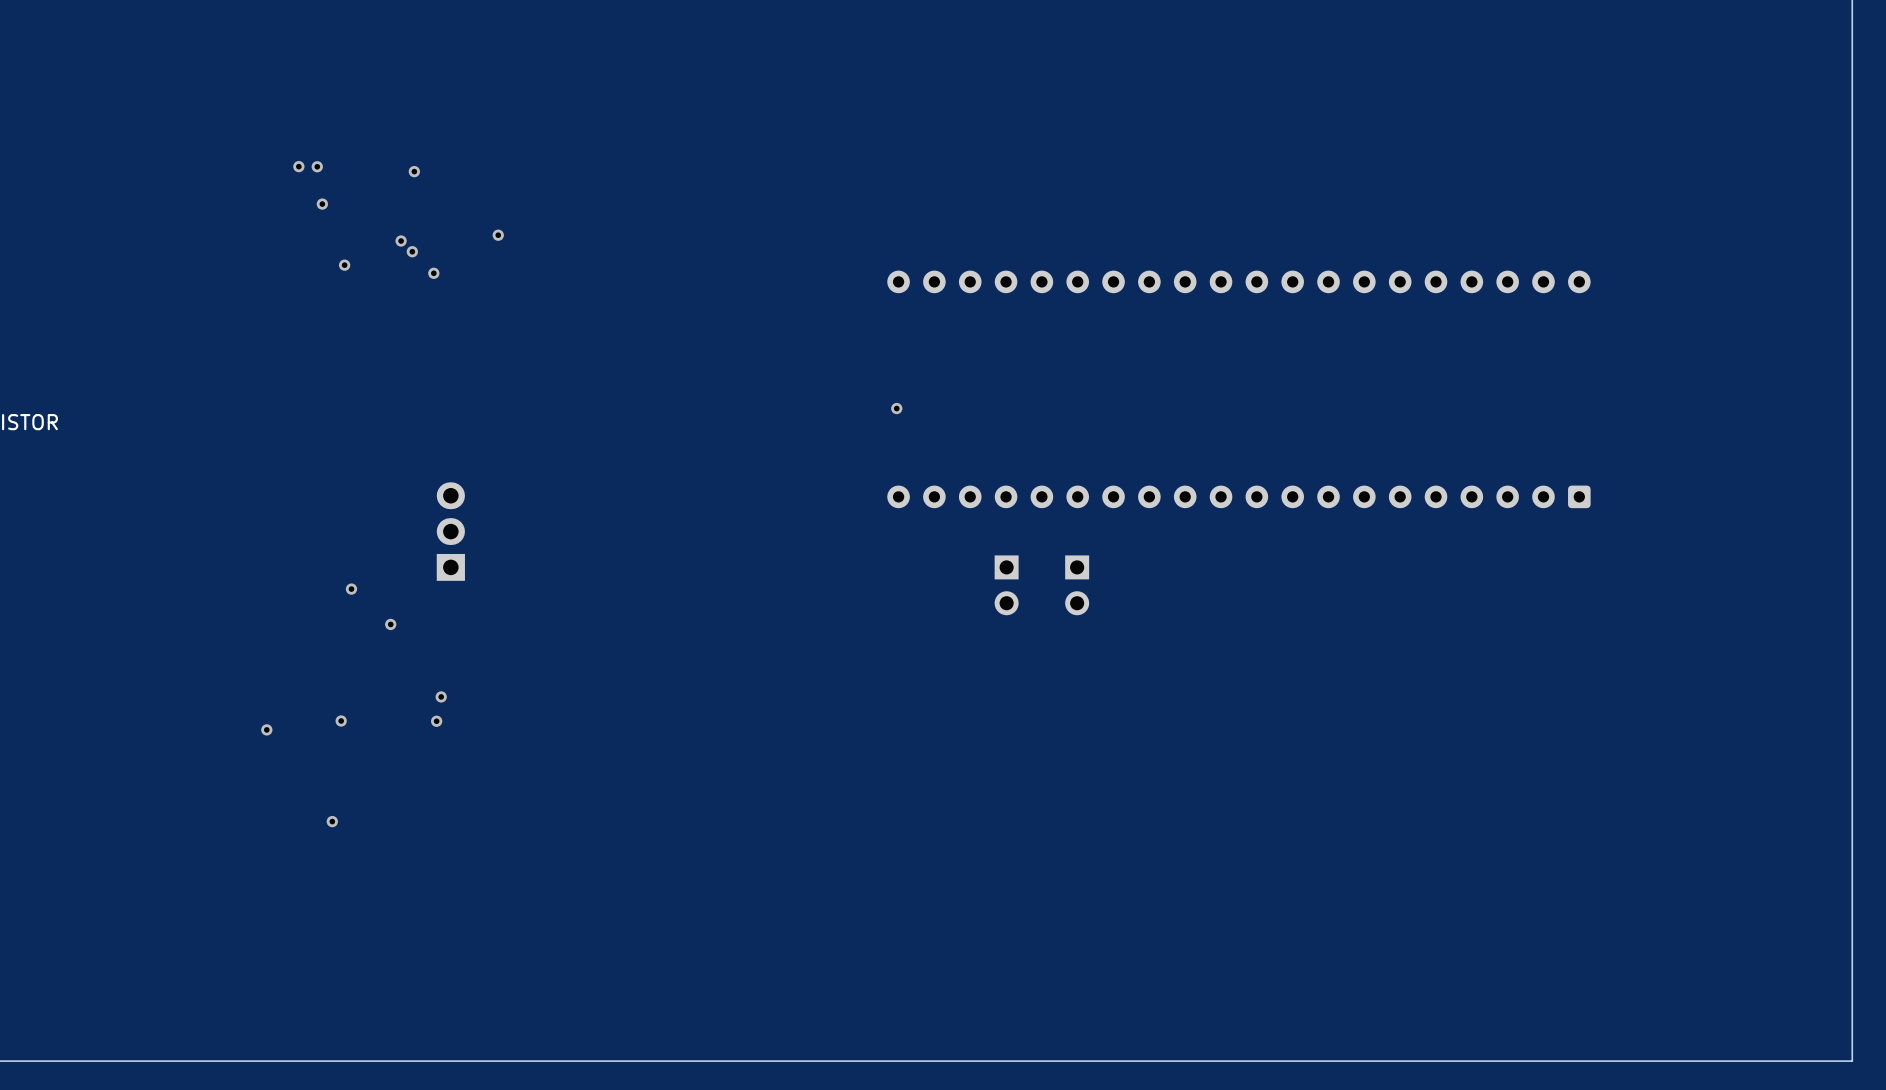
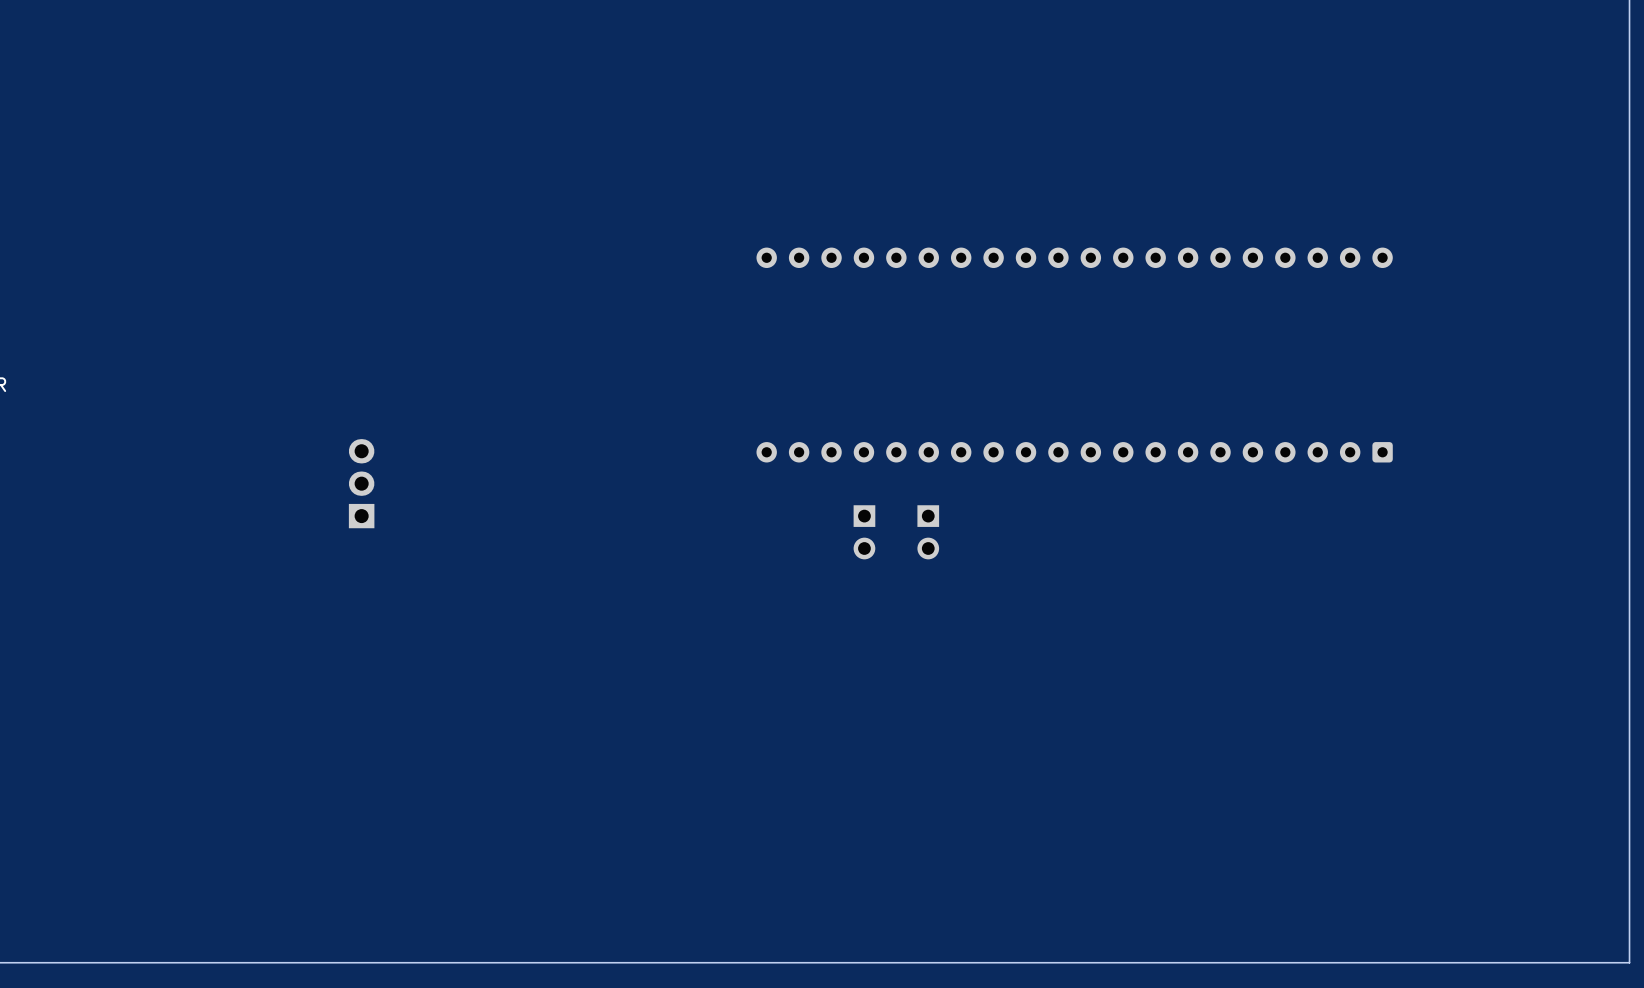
via: (298, 166) -> none
via: (317, 166) -> none
via: (414, 171) -> none
via: (322, 204) -> none
via: (498, 235) -> none
via: (401, 241) -> none
via: (412, 251) -> none
via: (344, 265) -> none
via: (433, 273) -> none
via: (896, 408) -> none
via: (351, 589) -> none
via: (390, 624) -> none
via: (441, 696) -> none
via: (341, 721) -> none
via: (436, 721) -> none
via: (266, 729) -> none
via: (332, 821) -> none

